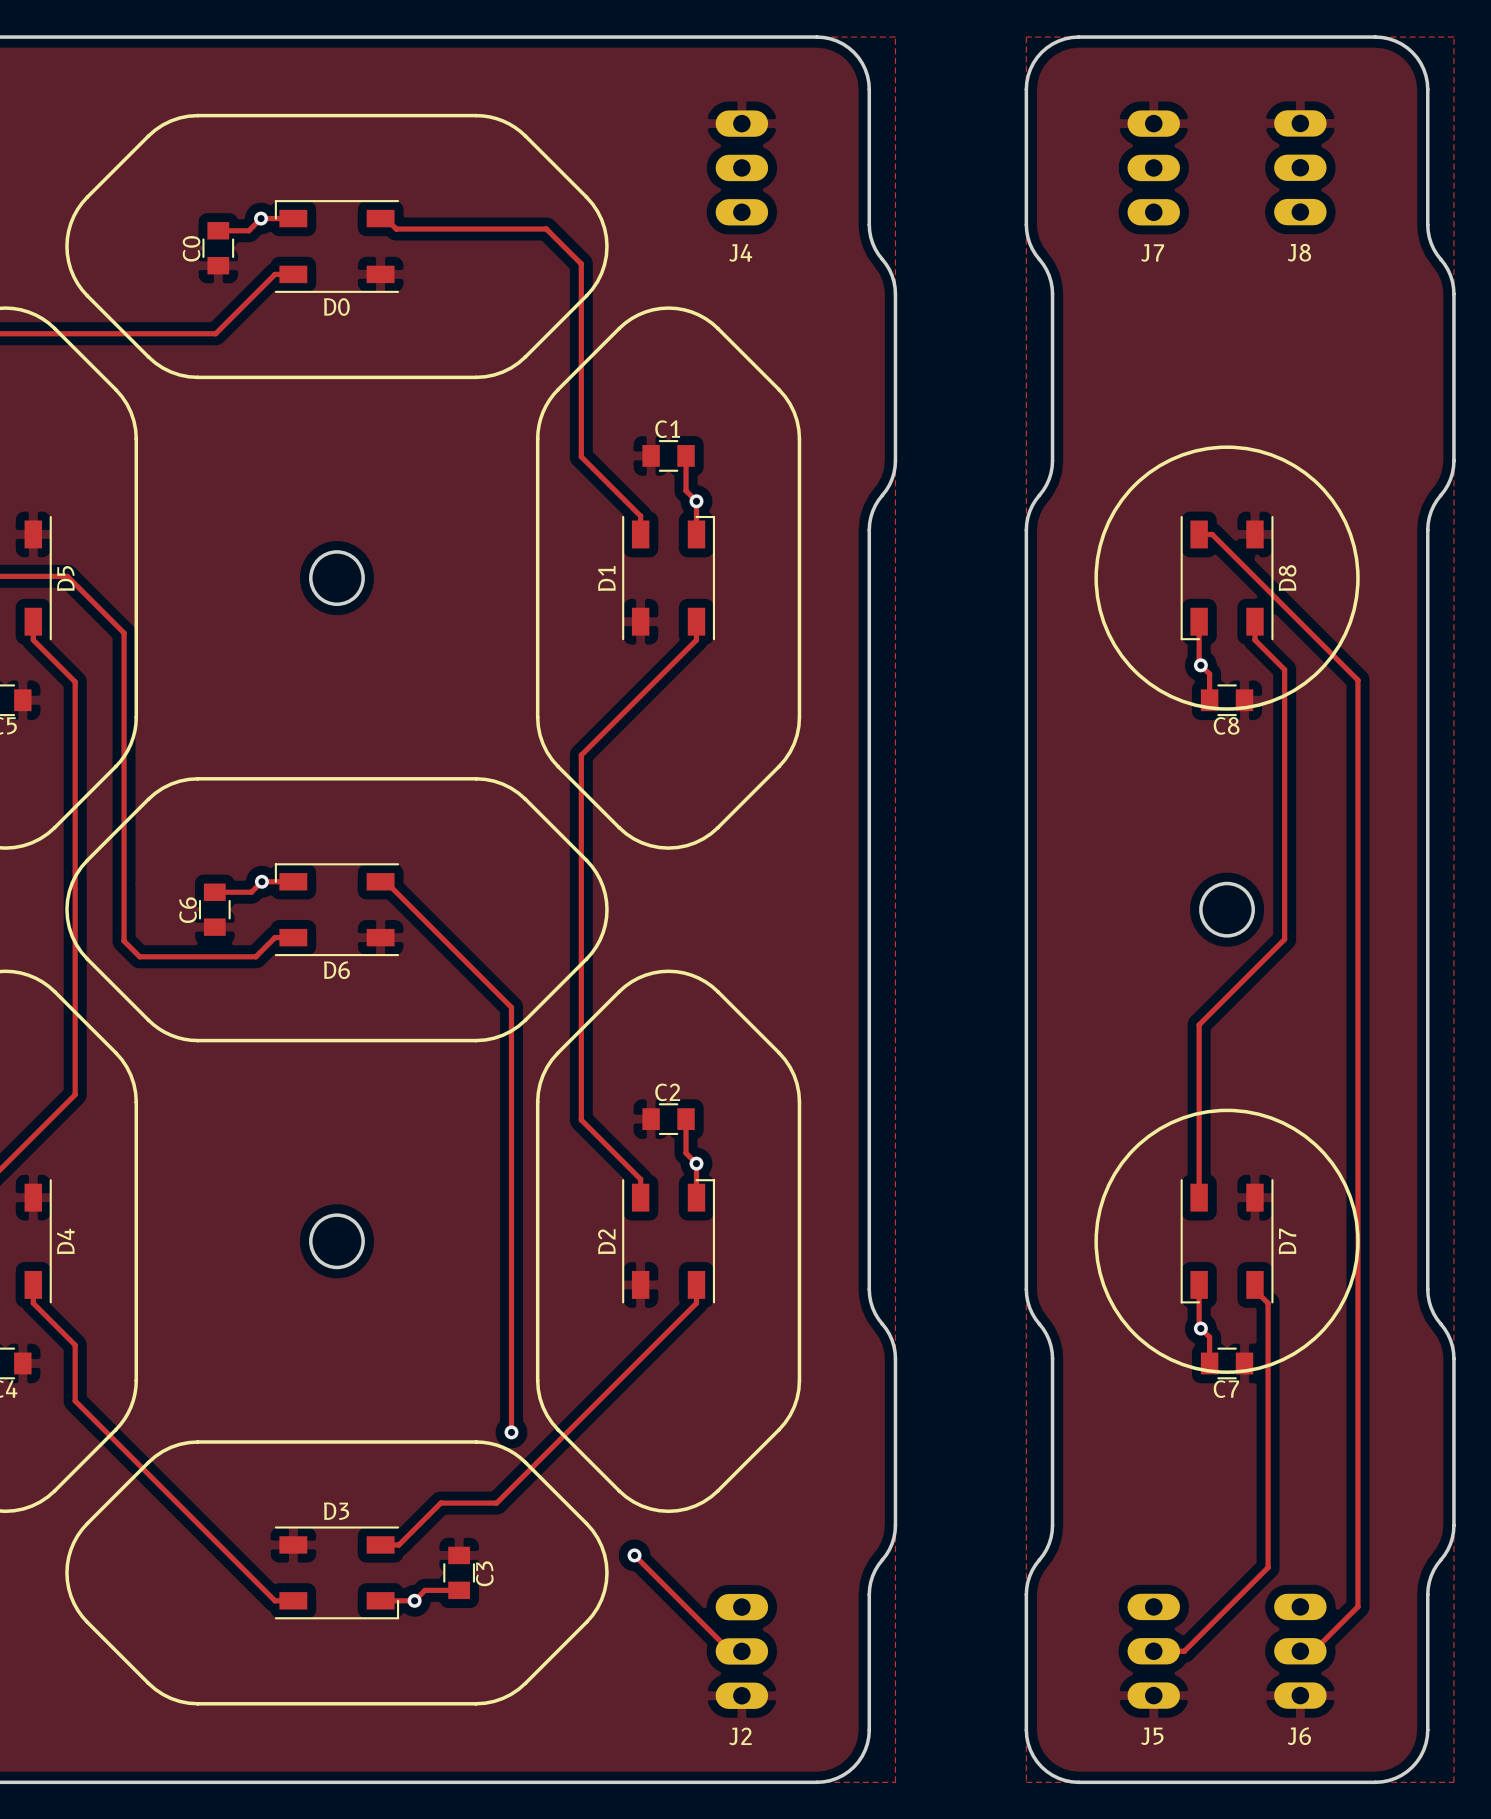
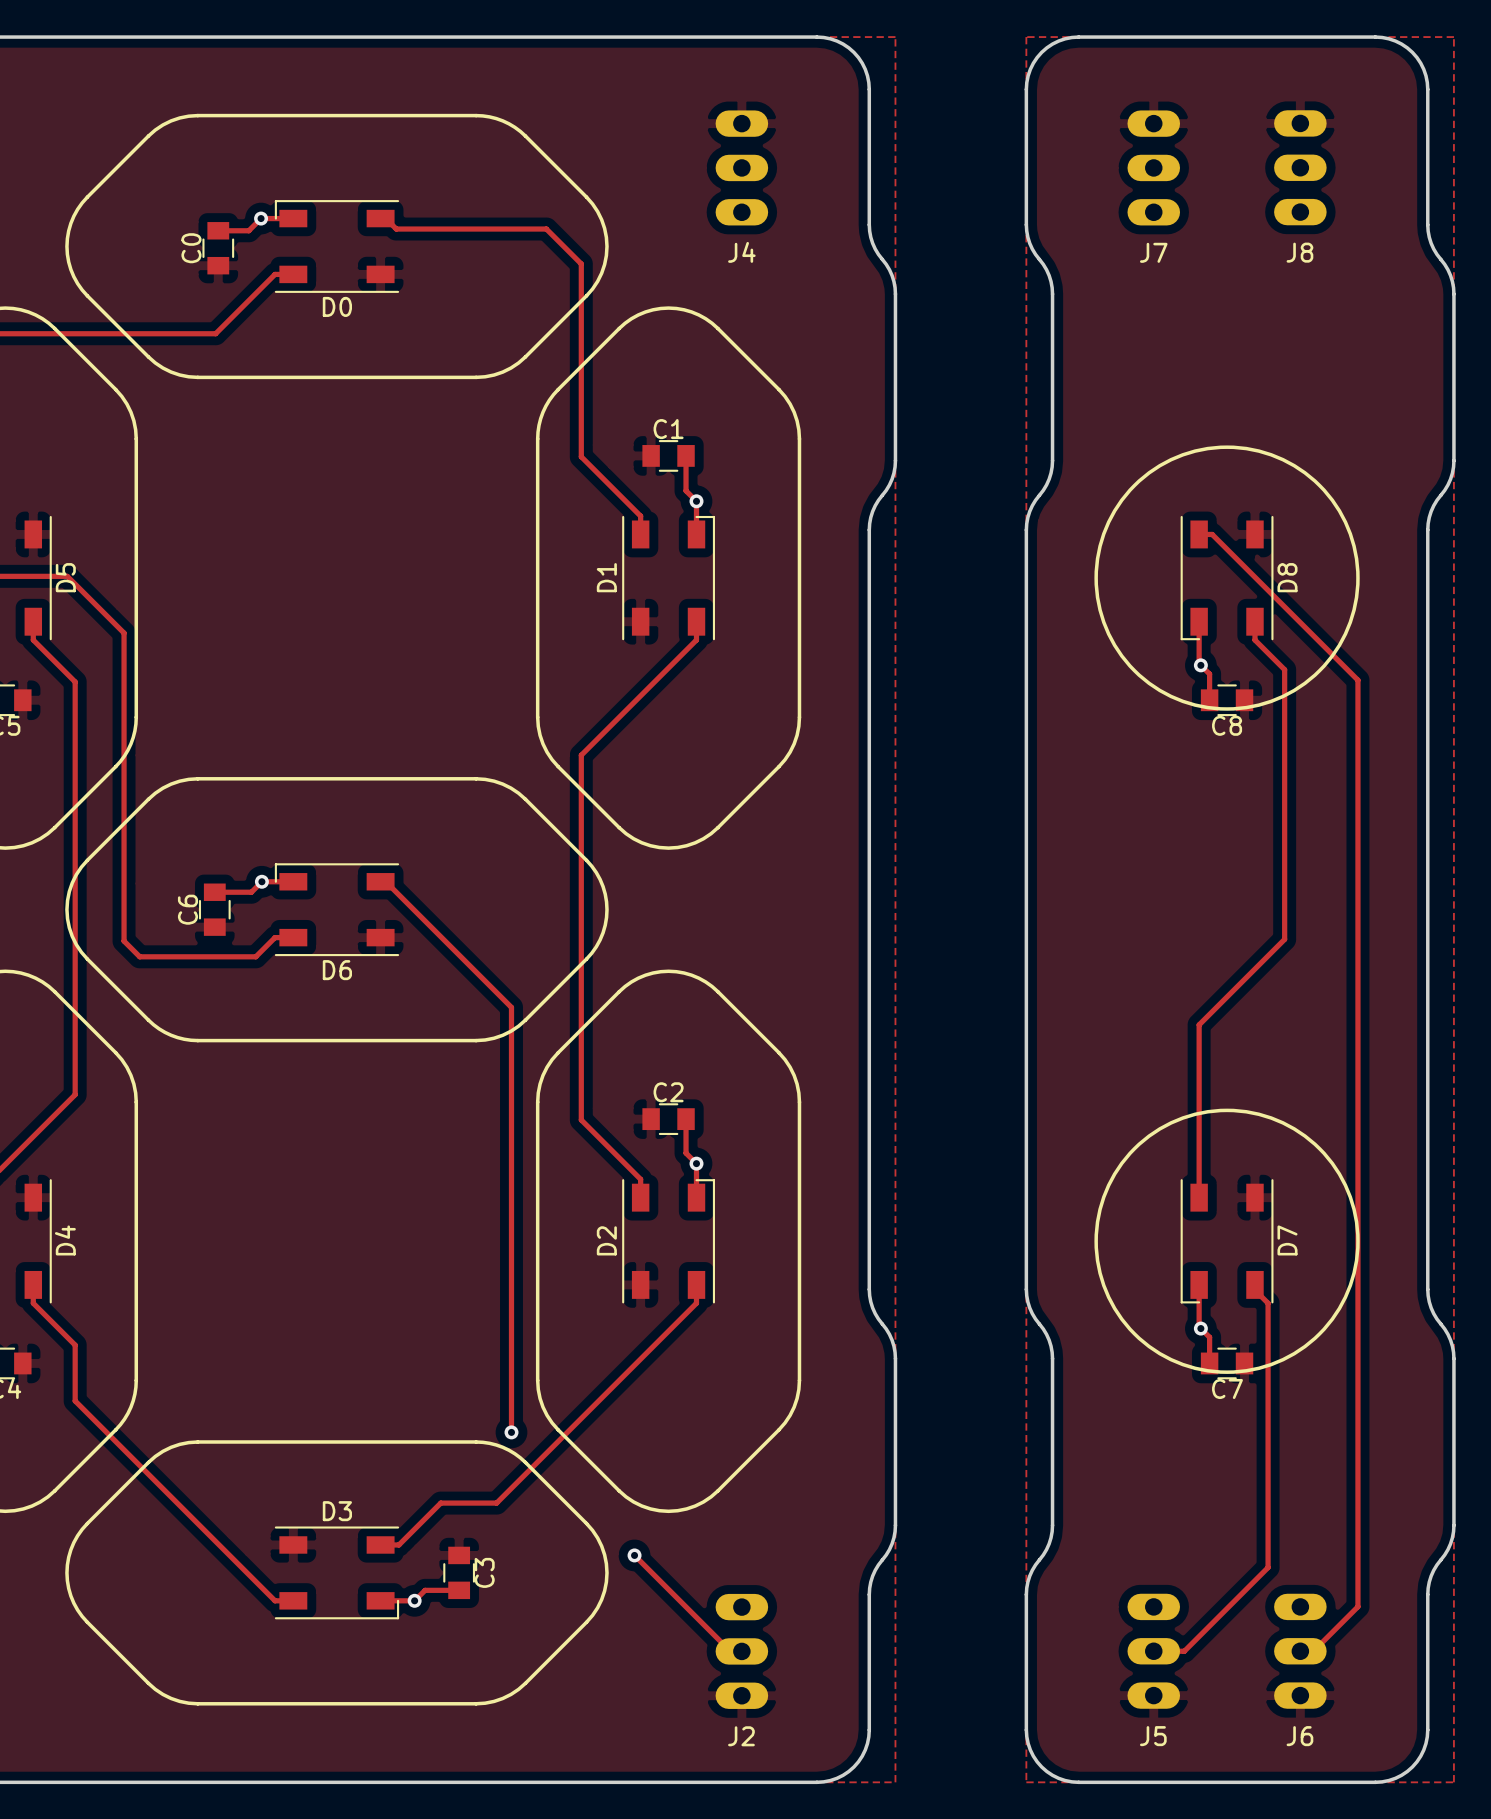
round board edge: [309, 550, 365, 607] -> none
round board edge: [1199, 881, 1255, 938] -> none
round board edge: [309, 1213, 365, 1270] -> none

